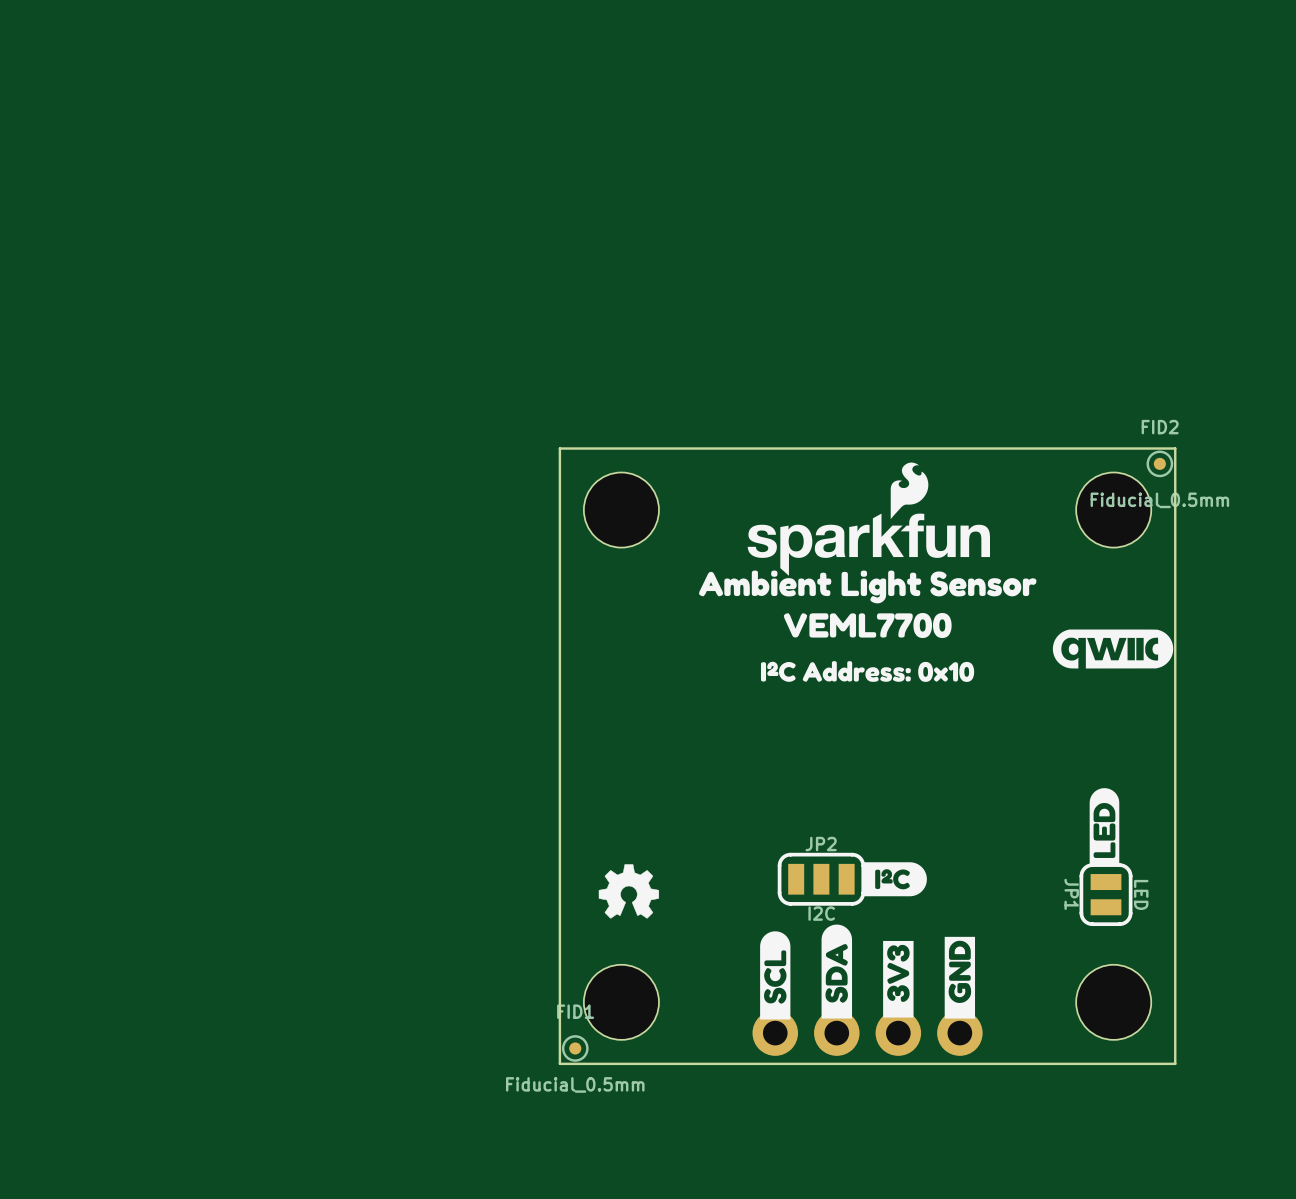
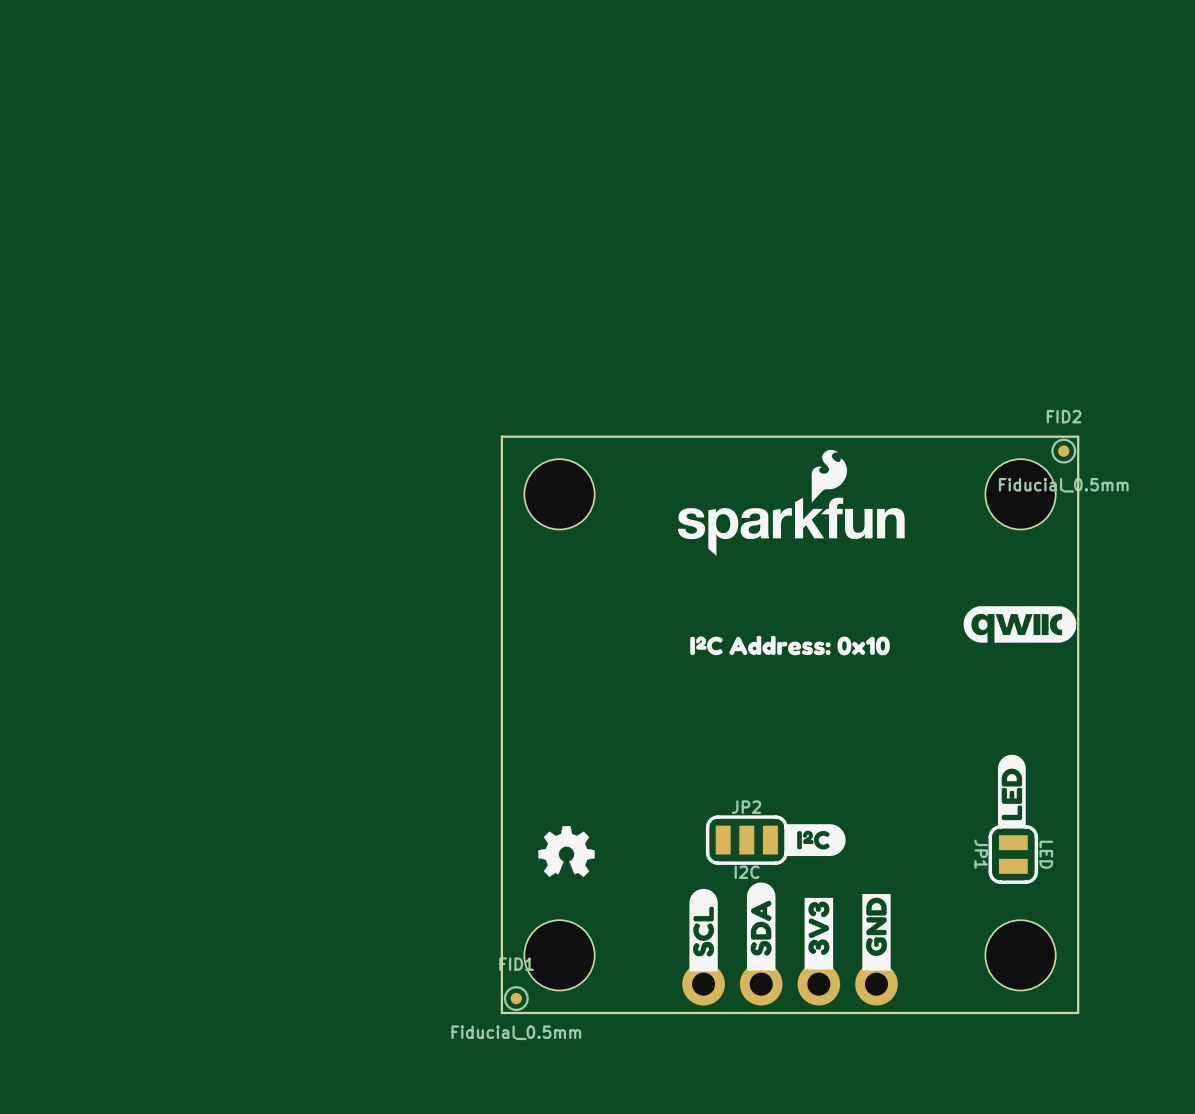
drawing: [698, 570, 1037, 639] -> none

